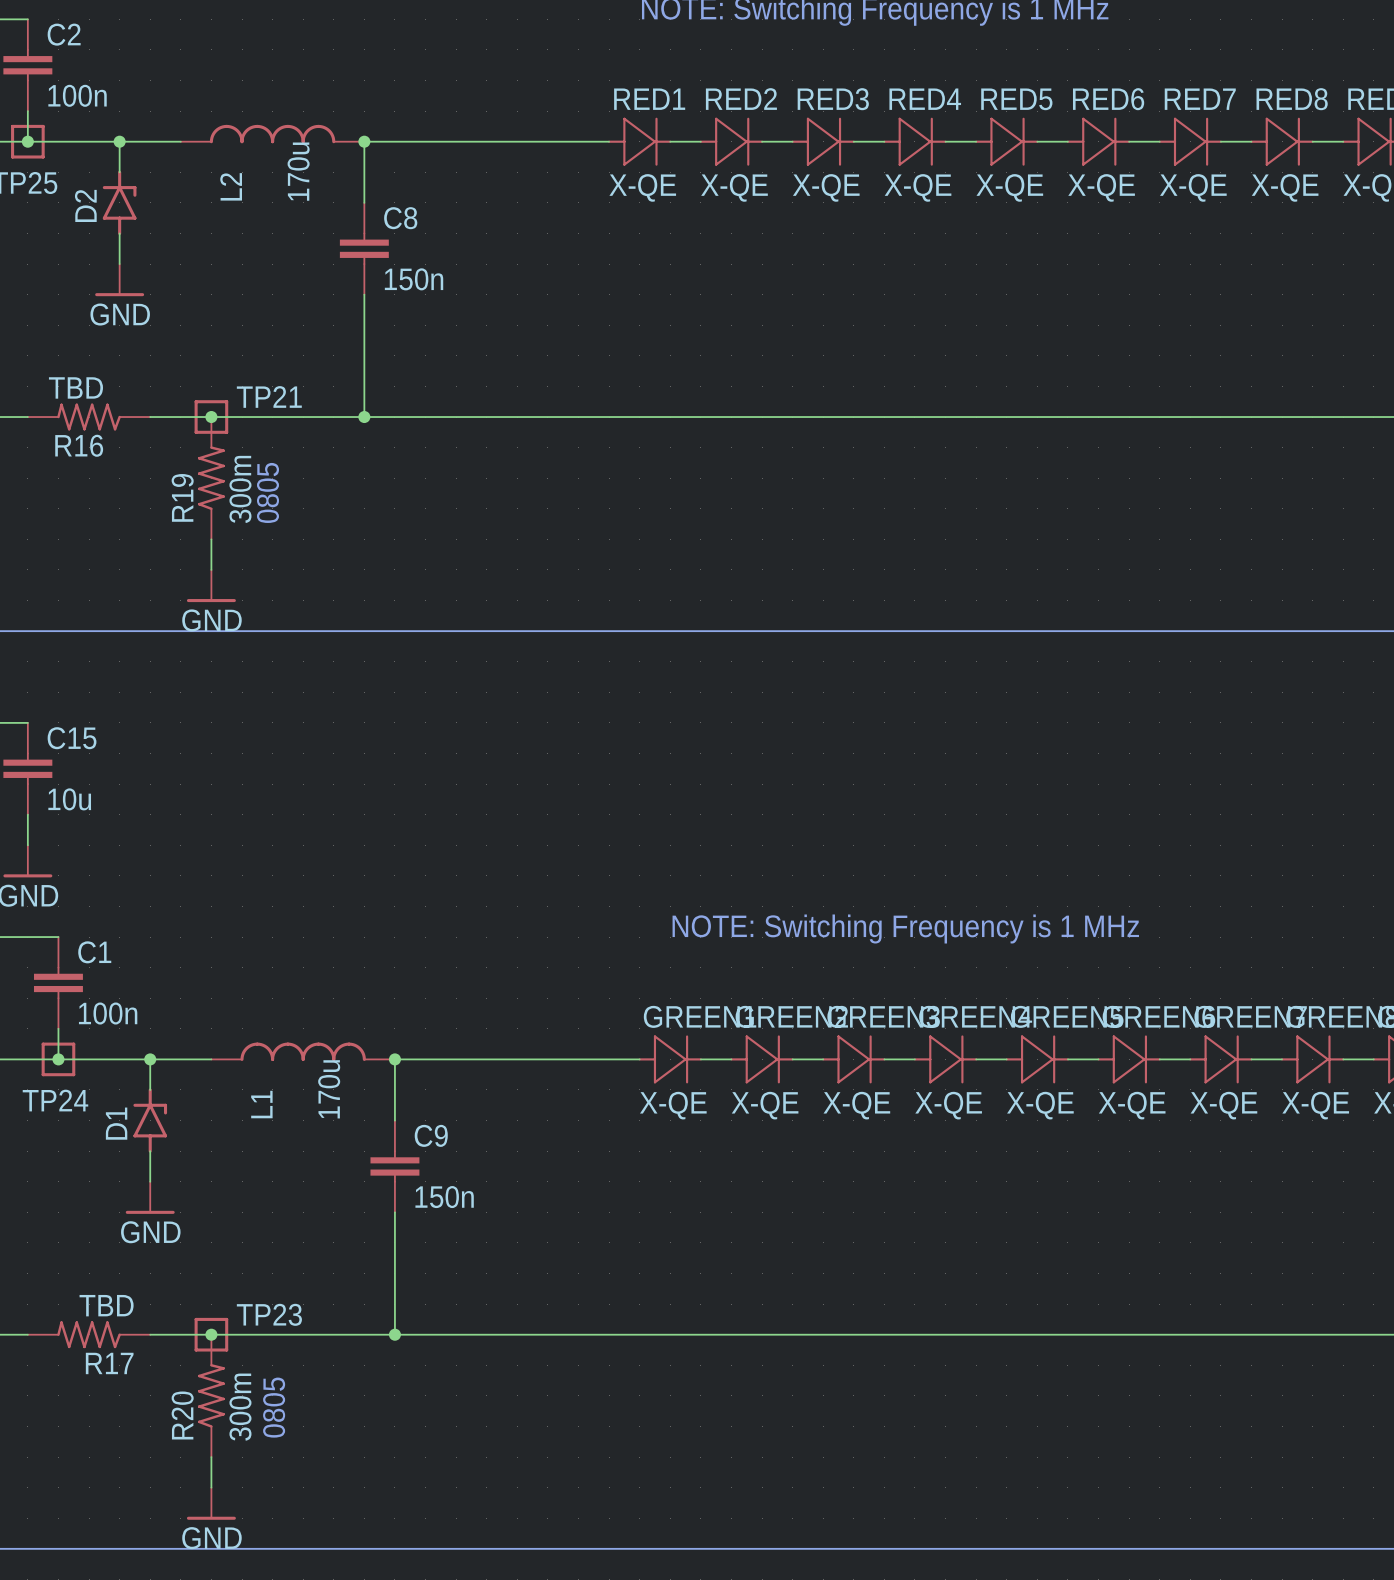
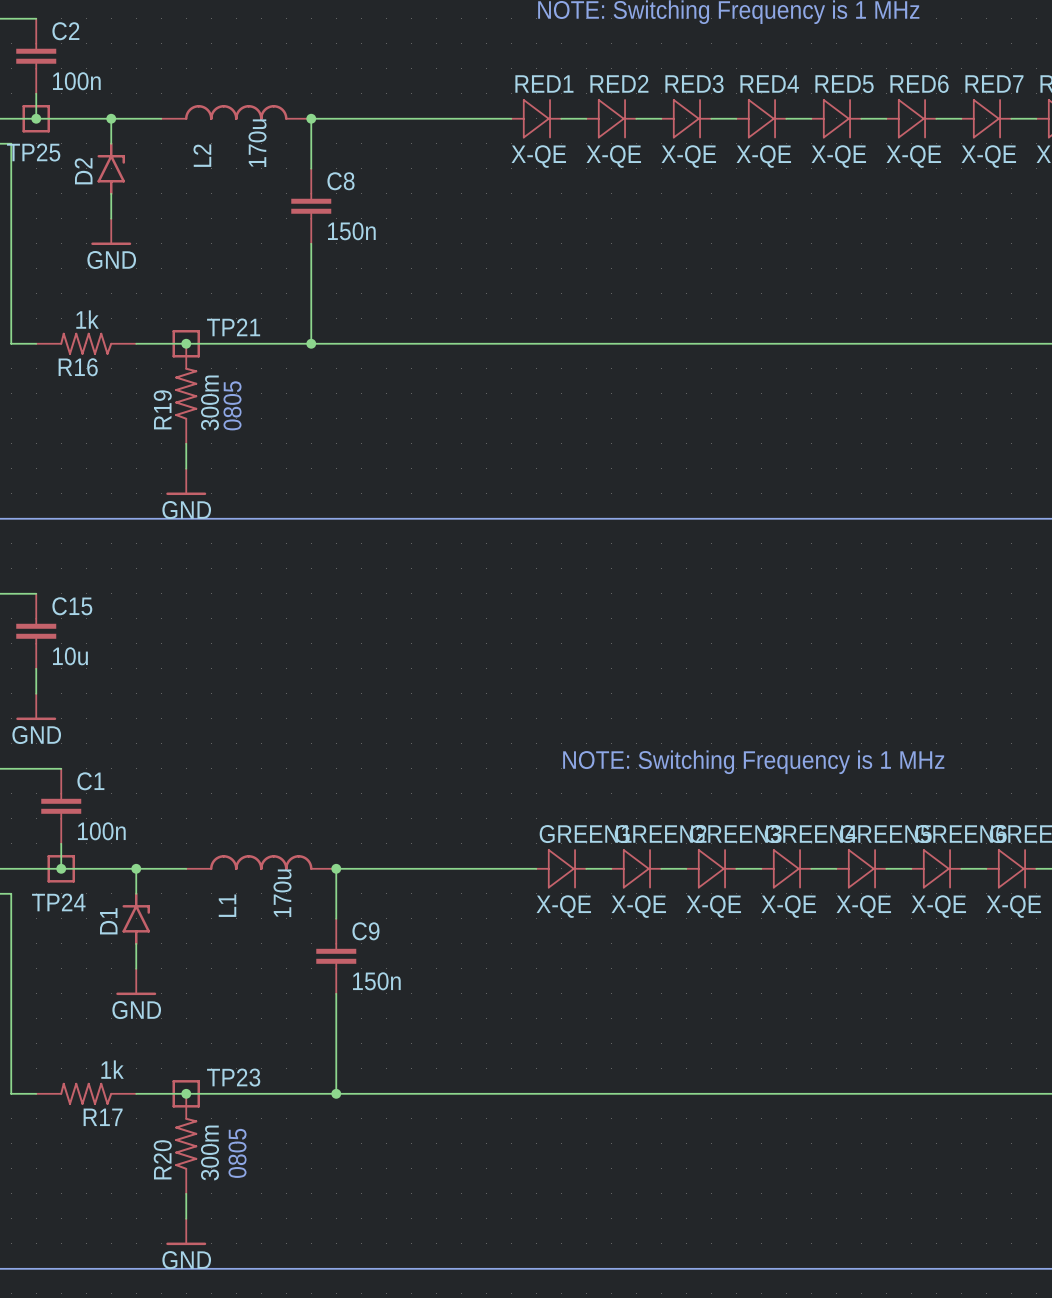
R16 value: TBD (75, 387) -> 1k (87, 319)
R17 value: TBD (106, 1305) -> 1k (112, 1069)

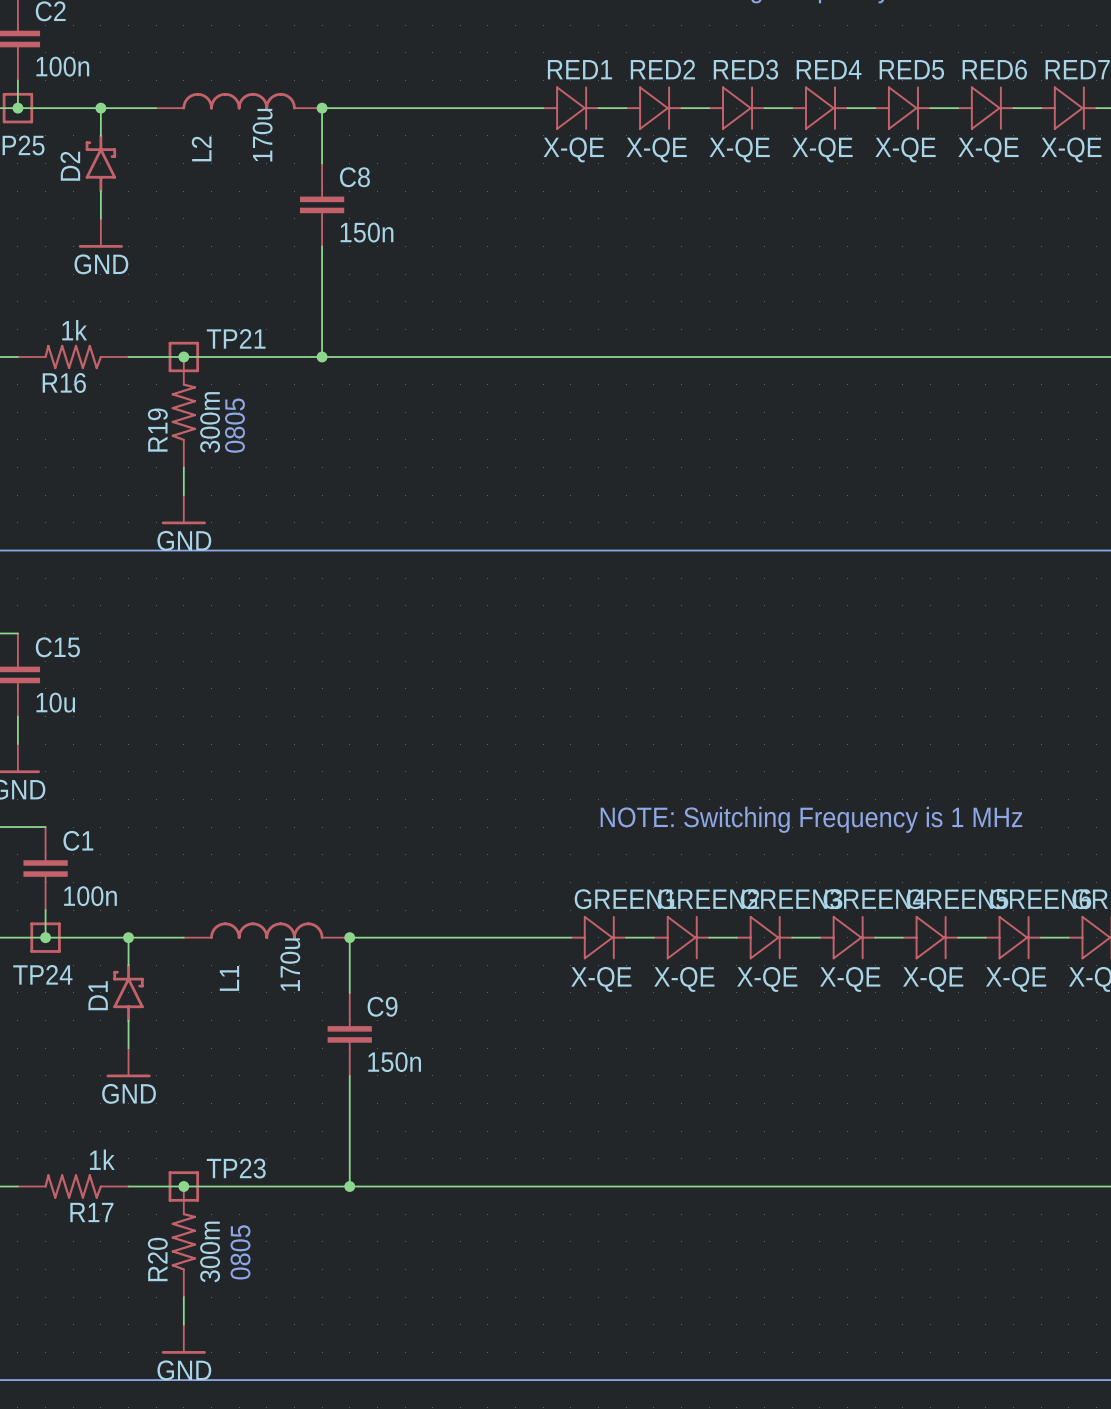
D2 symbol: [97, 142, 125, 196] -> [85, 134, 117, 193]
D1 symbol: [122, 892, 150, 946] -> [113, 963, 144, 1022]

